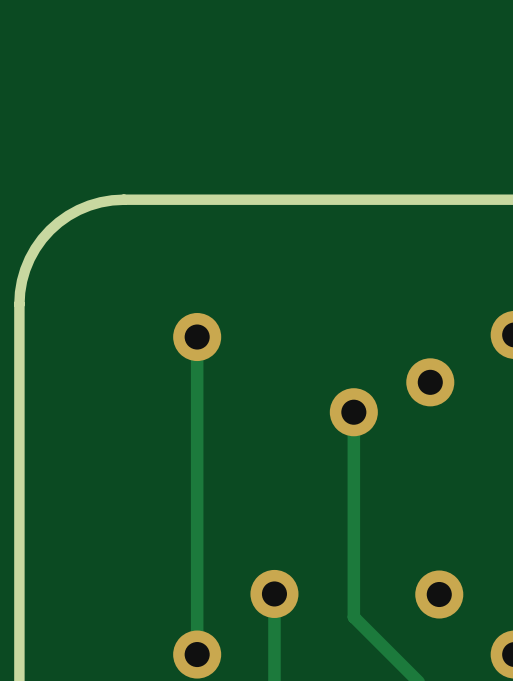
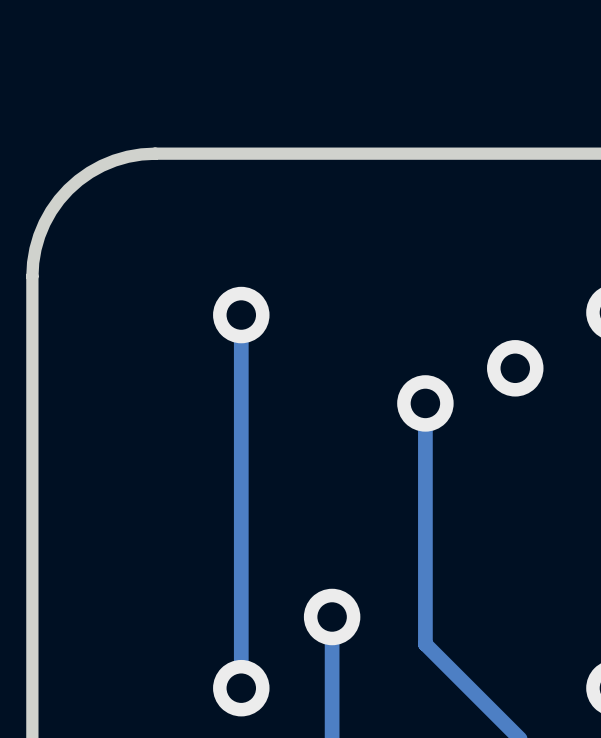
via: (439, 594) -> none

